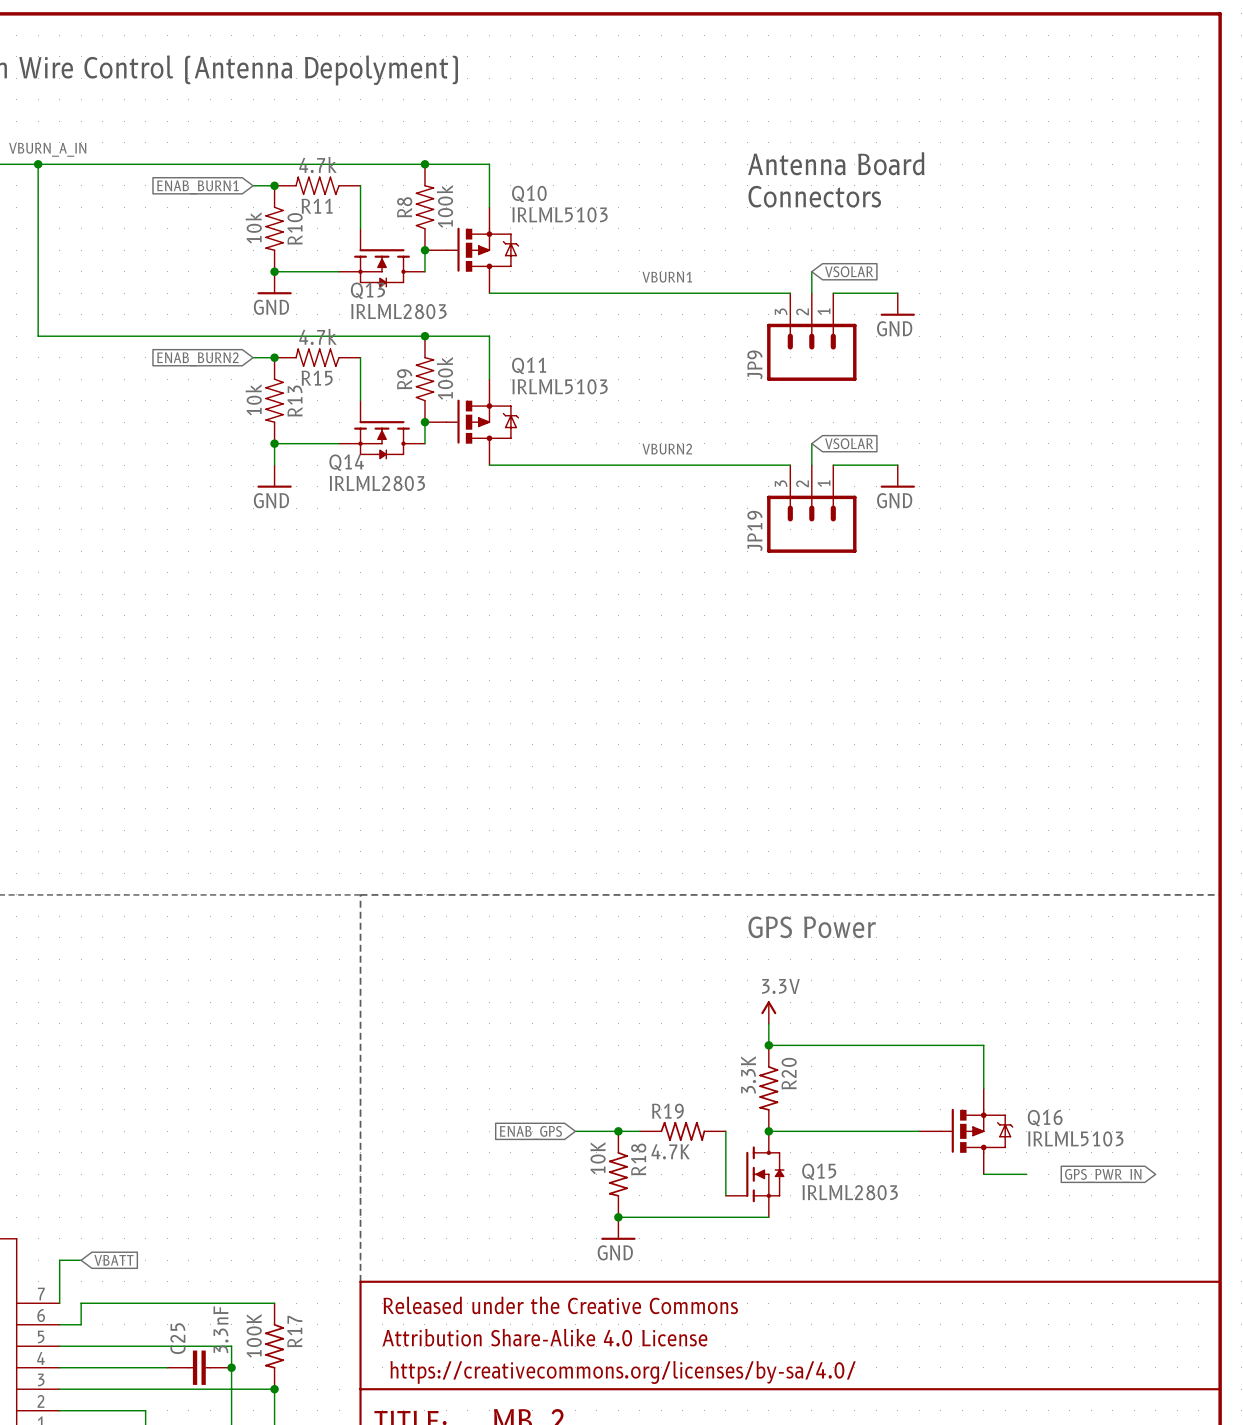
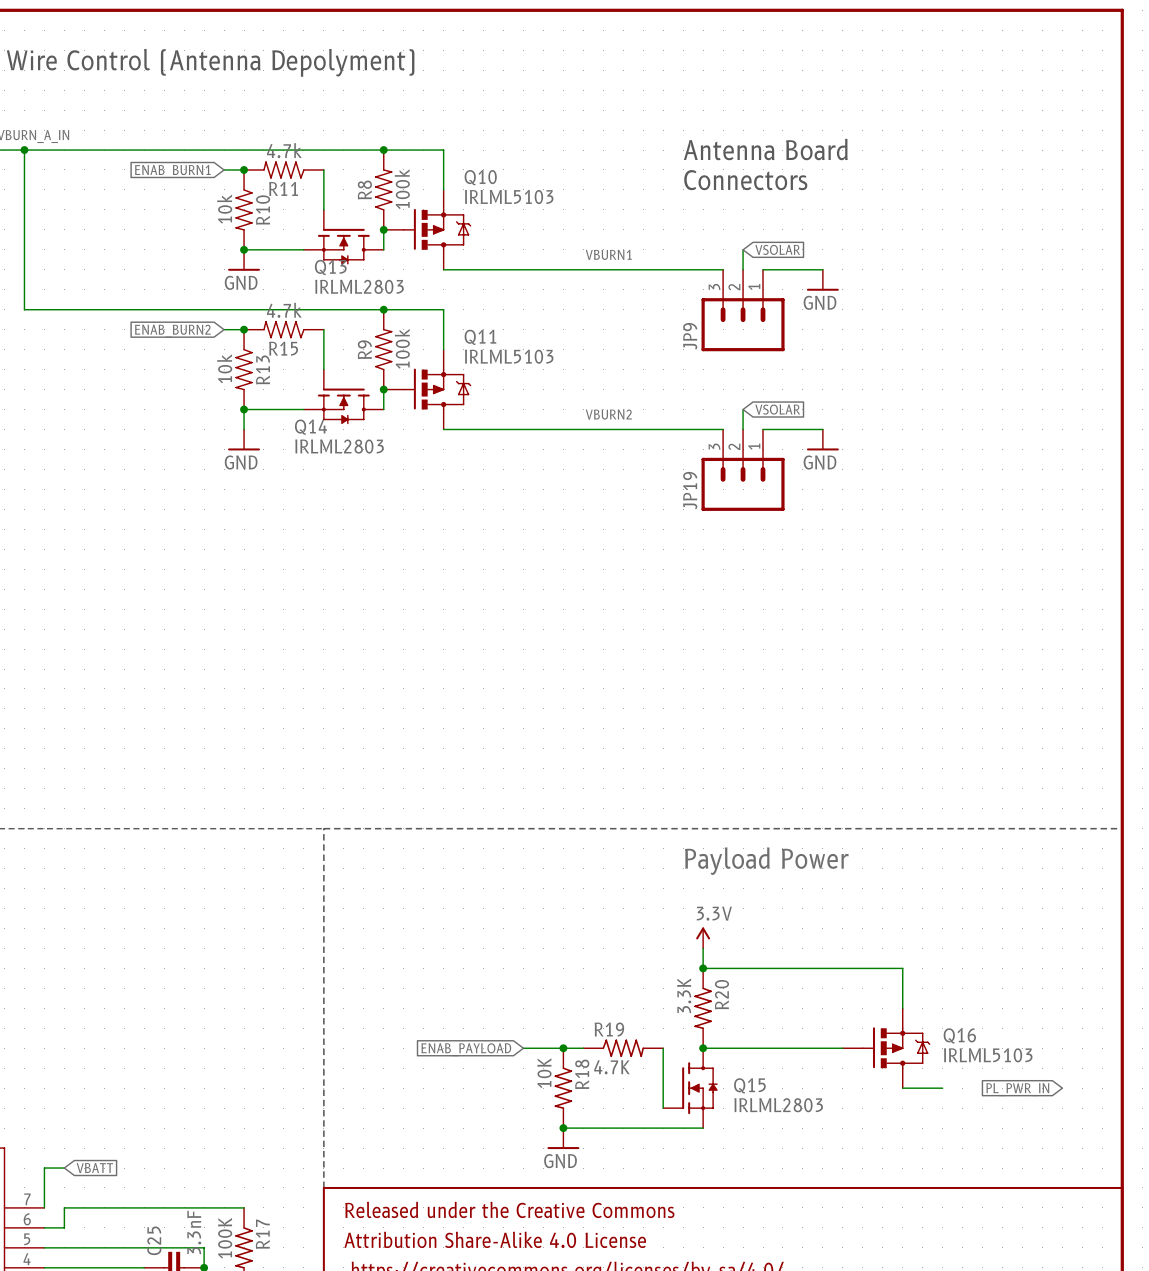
text: GPS Power (812, 927) -> Payload Power (766, 861)
global label: ENAB_GPS (530, 1132) -> ENAB_PAYLOAD (466, 1049)
global label: GPS_PWR_IN (1103, 1175) -> PL_PWR_IN (1017, 1089)

